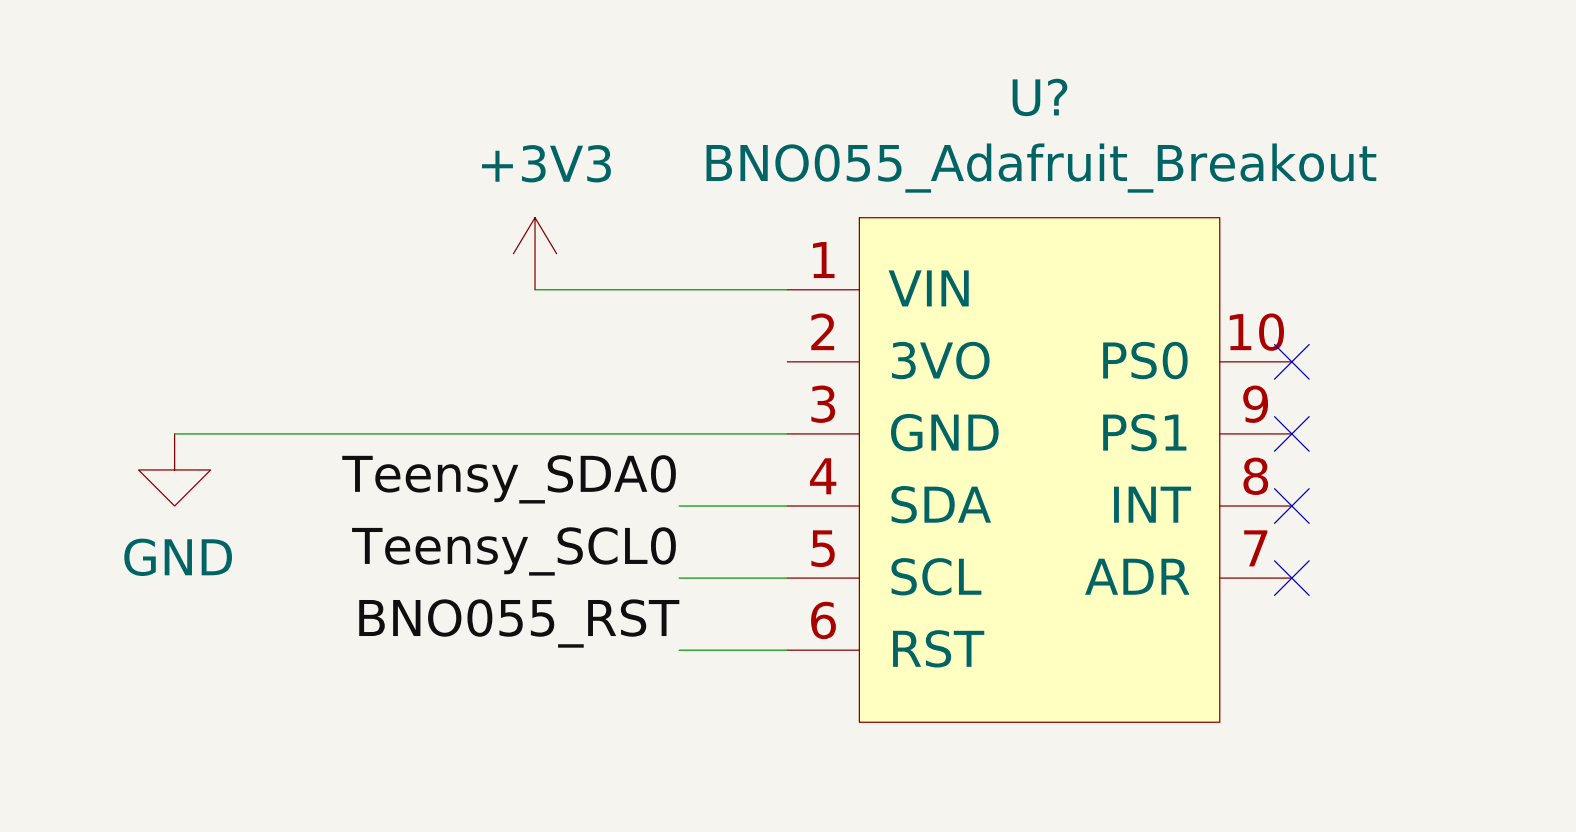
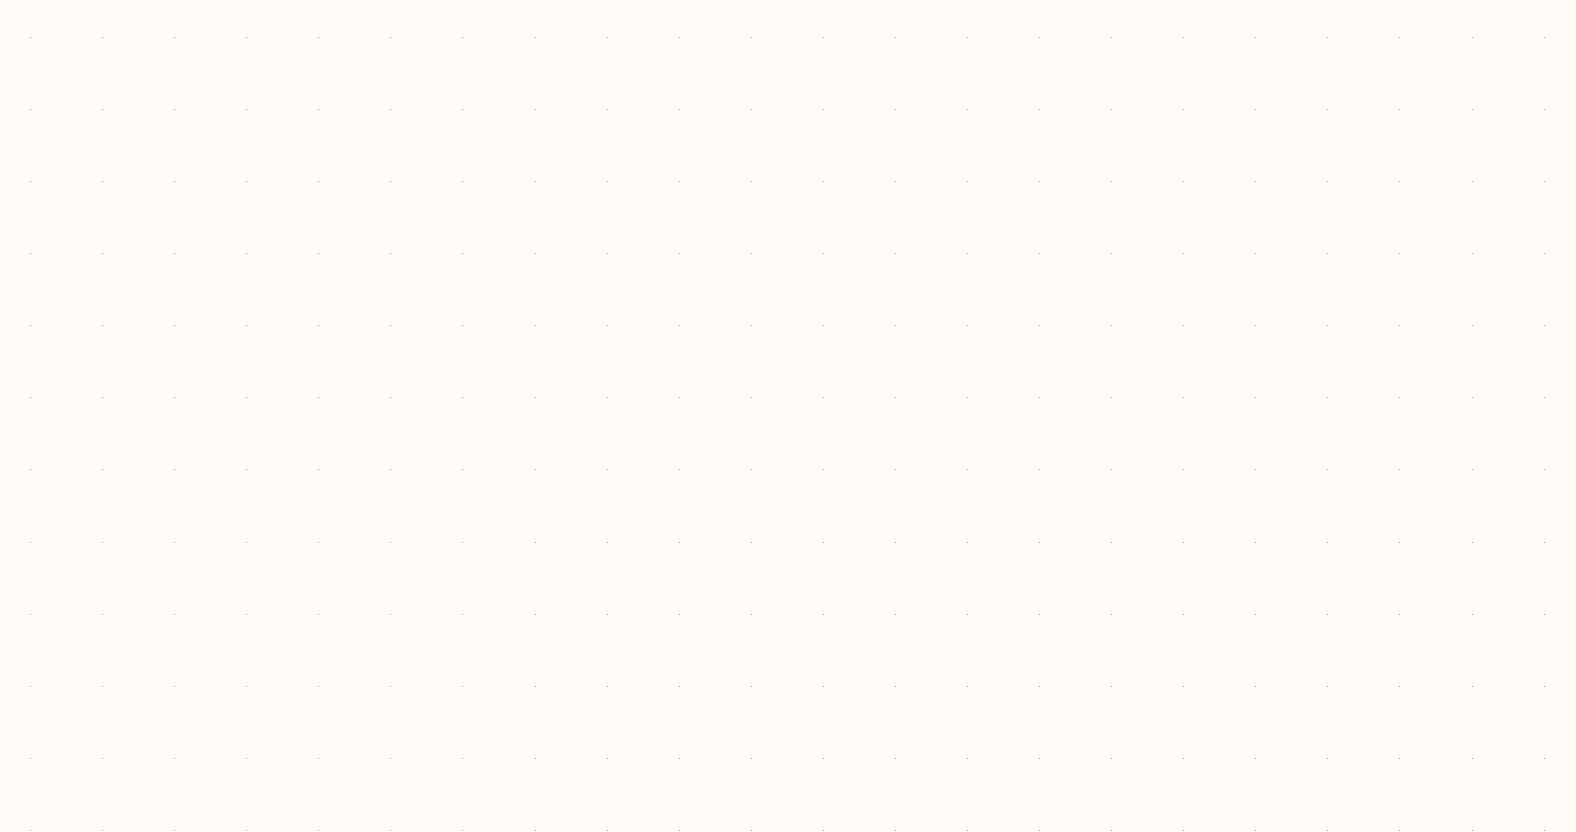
power symbol: +3V3 (535, 253) -> none
wire: (535, 289) (787, 289) -> none
no-connect mark: (1291, 361) -> none
wire: (174, 433) (787, 433) -> none
no-connect mark: (1291, 433) -> none
power symbol: GND (174, 469) -> none
U?: BNO055_Adafruit_Breakout (1039, 469) -> none
label: Teensy_SDA0 (509, 479) -> none
wire: (679, 506) (787, 506) -> none
no-connect mark: (1291, 506) -> none
label: Teensy_SCL0 (513, 551) -> none
wire: (679, 578) (787, 578) -> none
no-connect mark: (1291, 578) -> none
label: BNO055_RST (519, 623) -> none
wire: (679, 650) (787, 650) -> none

